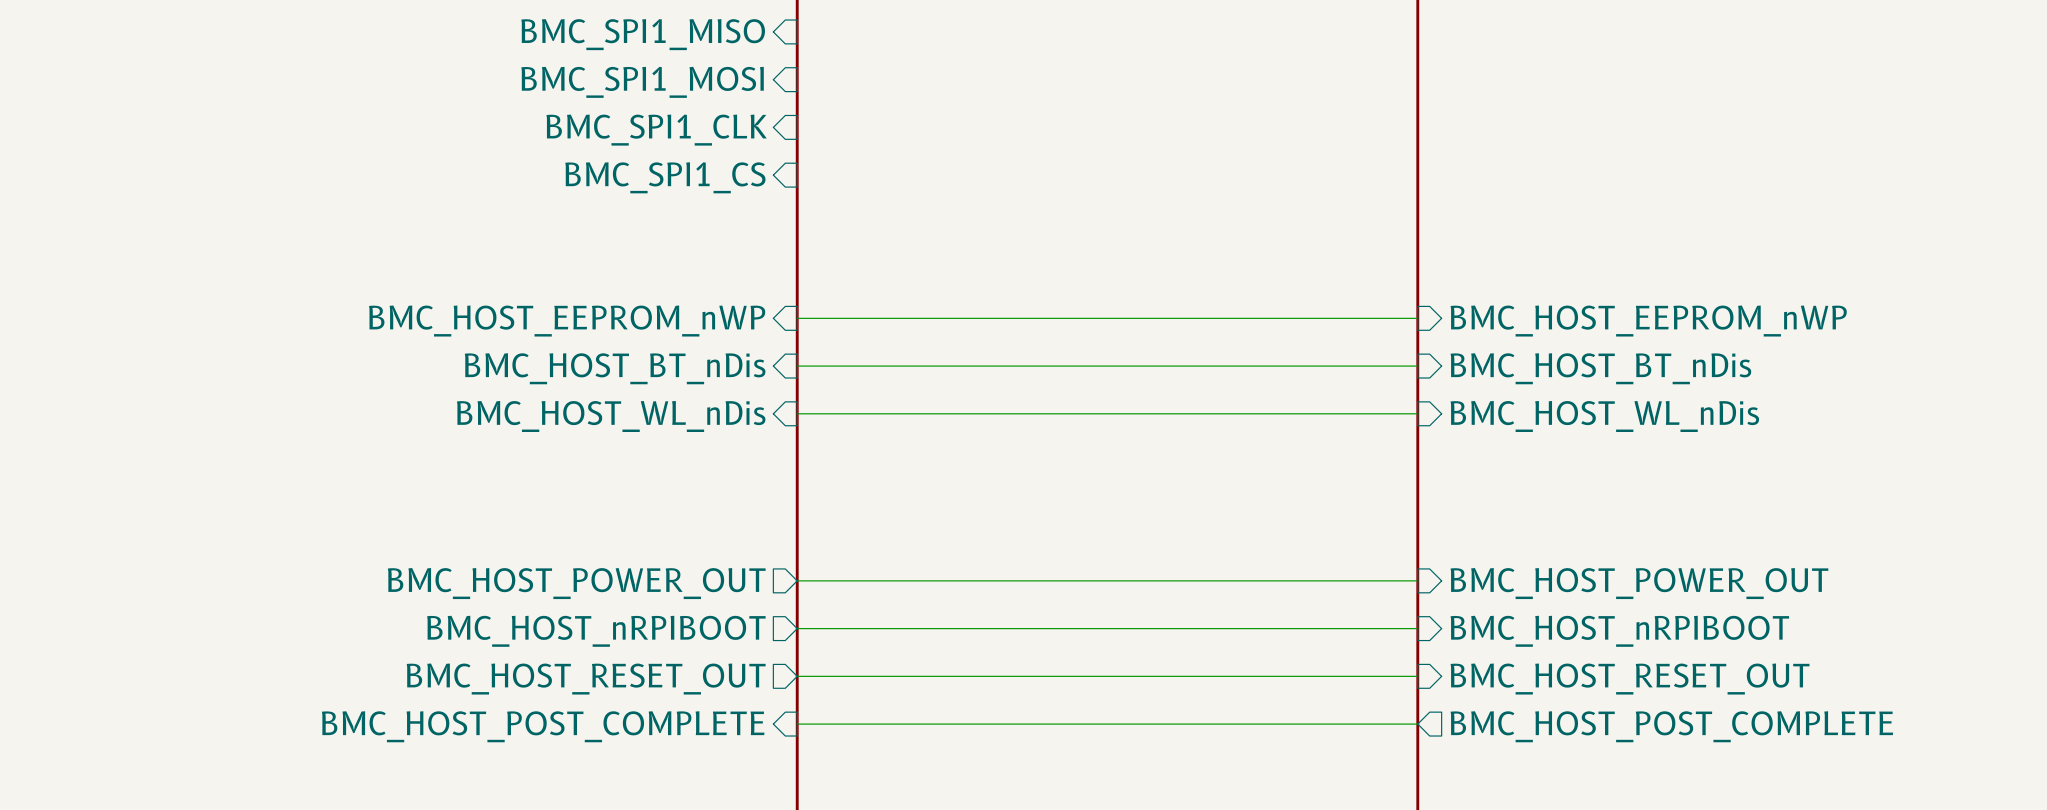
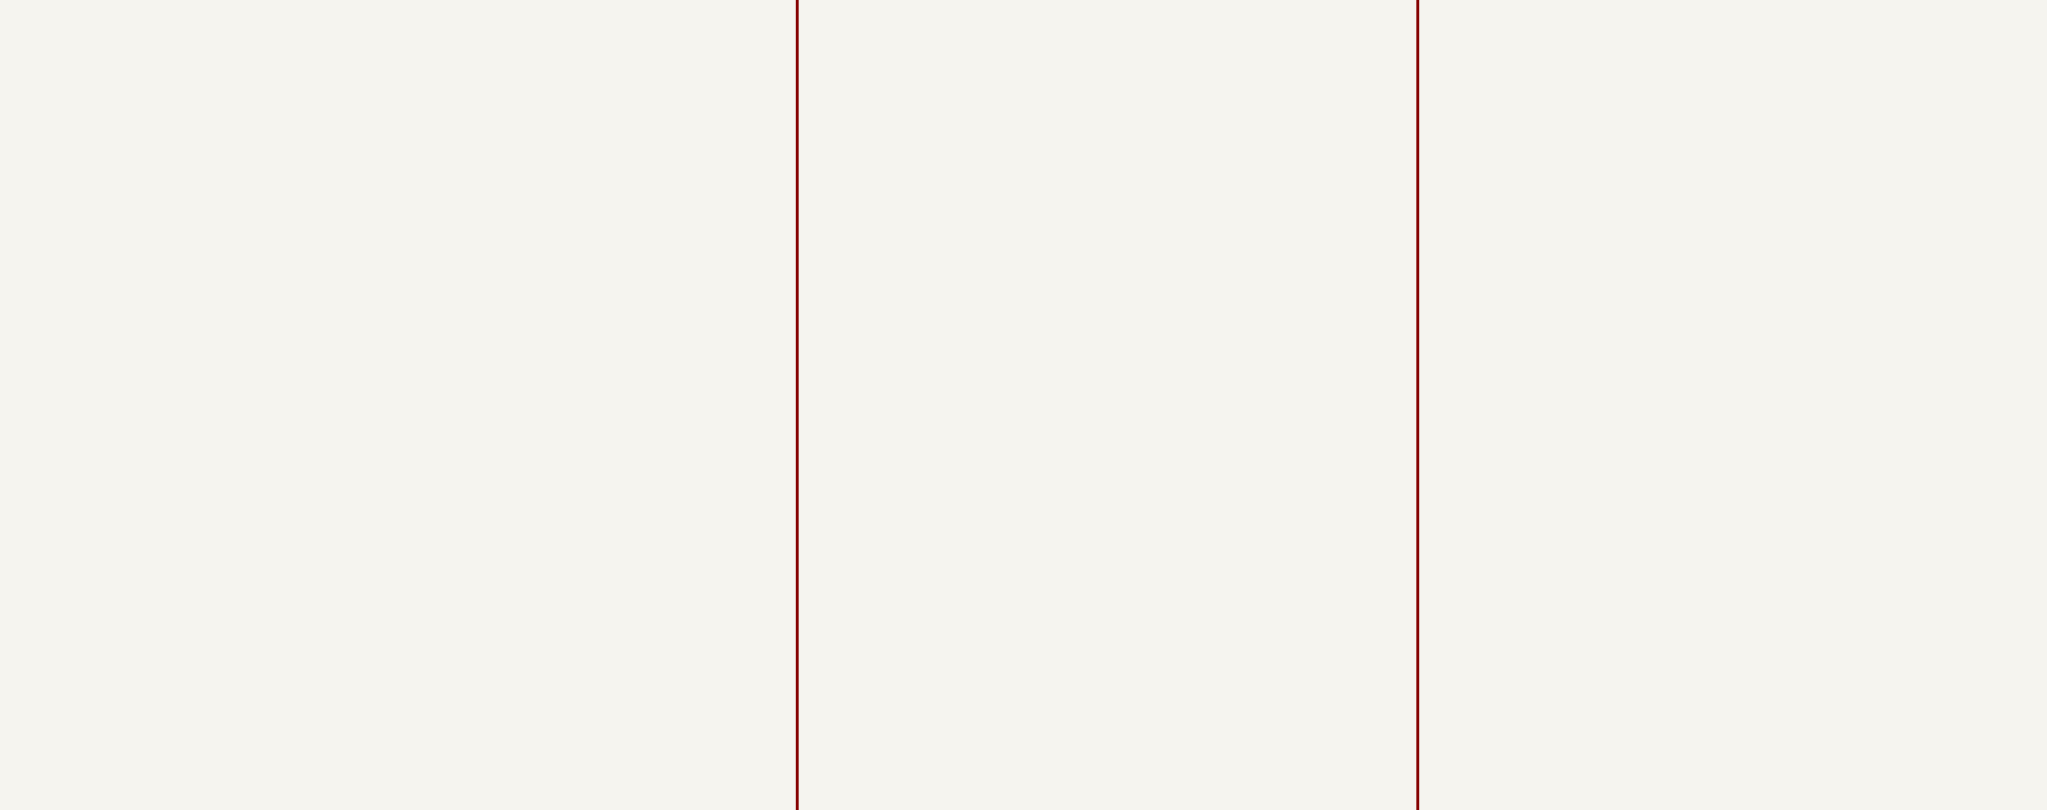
sheet pin: BMC_SPI1_MISO (643, 34) -> none
sheet pin: BMC_SPI1_MOSI (642, 82) -> none
sheet pin: BMC_SPI1_CLK (656, 130) -> none
sheet pin: BMC_SPI1_CS (665, 177) -> none
wire: (797, 318) (1417, 318) -> none
sheet pin: BMC_HOST_EEPROM_nWP (567, 321) -> none
sheet pin: BMC_HOST_EEPROM_nWP (1648, 321) -> none
wire: (797, 366) (1417, 366) -> none
sheet pin: BMC_HOST_BT_nDis (615, 368) -> none
sheet pin: BMC_HOST_BT_nDis (1600, 368) -> none
wire: (797, 413) (1417, 413) -> none
sheet pin: BMC_HOST_WL_nDis (611, 416) -> none
sheet pin: BMC_HOST_WL_nDis (1604, 416) -> none
wire: (797, 580) (1417, 580) -> none
sheet pin: BMC_HOST_POWER_OUT (576, 583) -> none
sheet pin: BMC_HOST_POWER_OUT (1639, 583) -> none
wire: (797, 628) (1417, 628) -> none
sheet pin: BMC_HOST_nRPIBOOT (596, 631) -> none
sheet pin: BMC_HOST_nRPIBOOT (1619, 631) -> none
wire: (797, 676) (1417, 676) -> none
sheet pin: BMC_HOST_RESET_OUT (586, 679) -> none
sheet pin: BMC_HOST_RESET_OUT (1630, 679) -> none
wire: (797, 724) (1417, 724) -> none
sheet pin: BMC_HOST_POST_COMPLETE (543, 726) -> none
sheet pin: BMC_HOST_POST_COMPLETE (1671, 726) -> none

